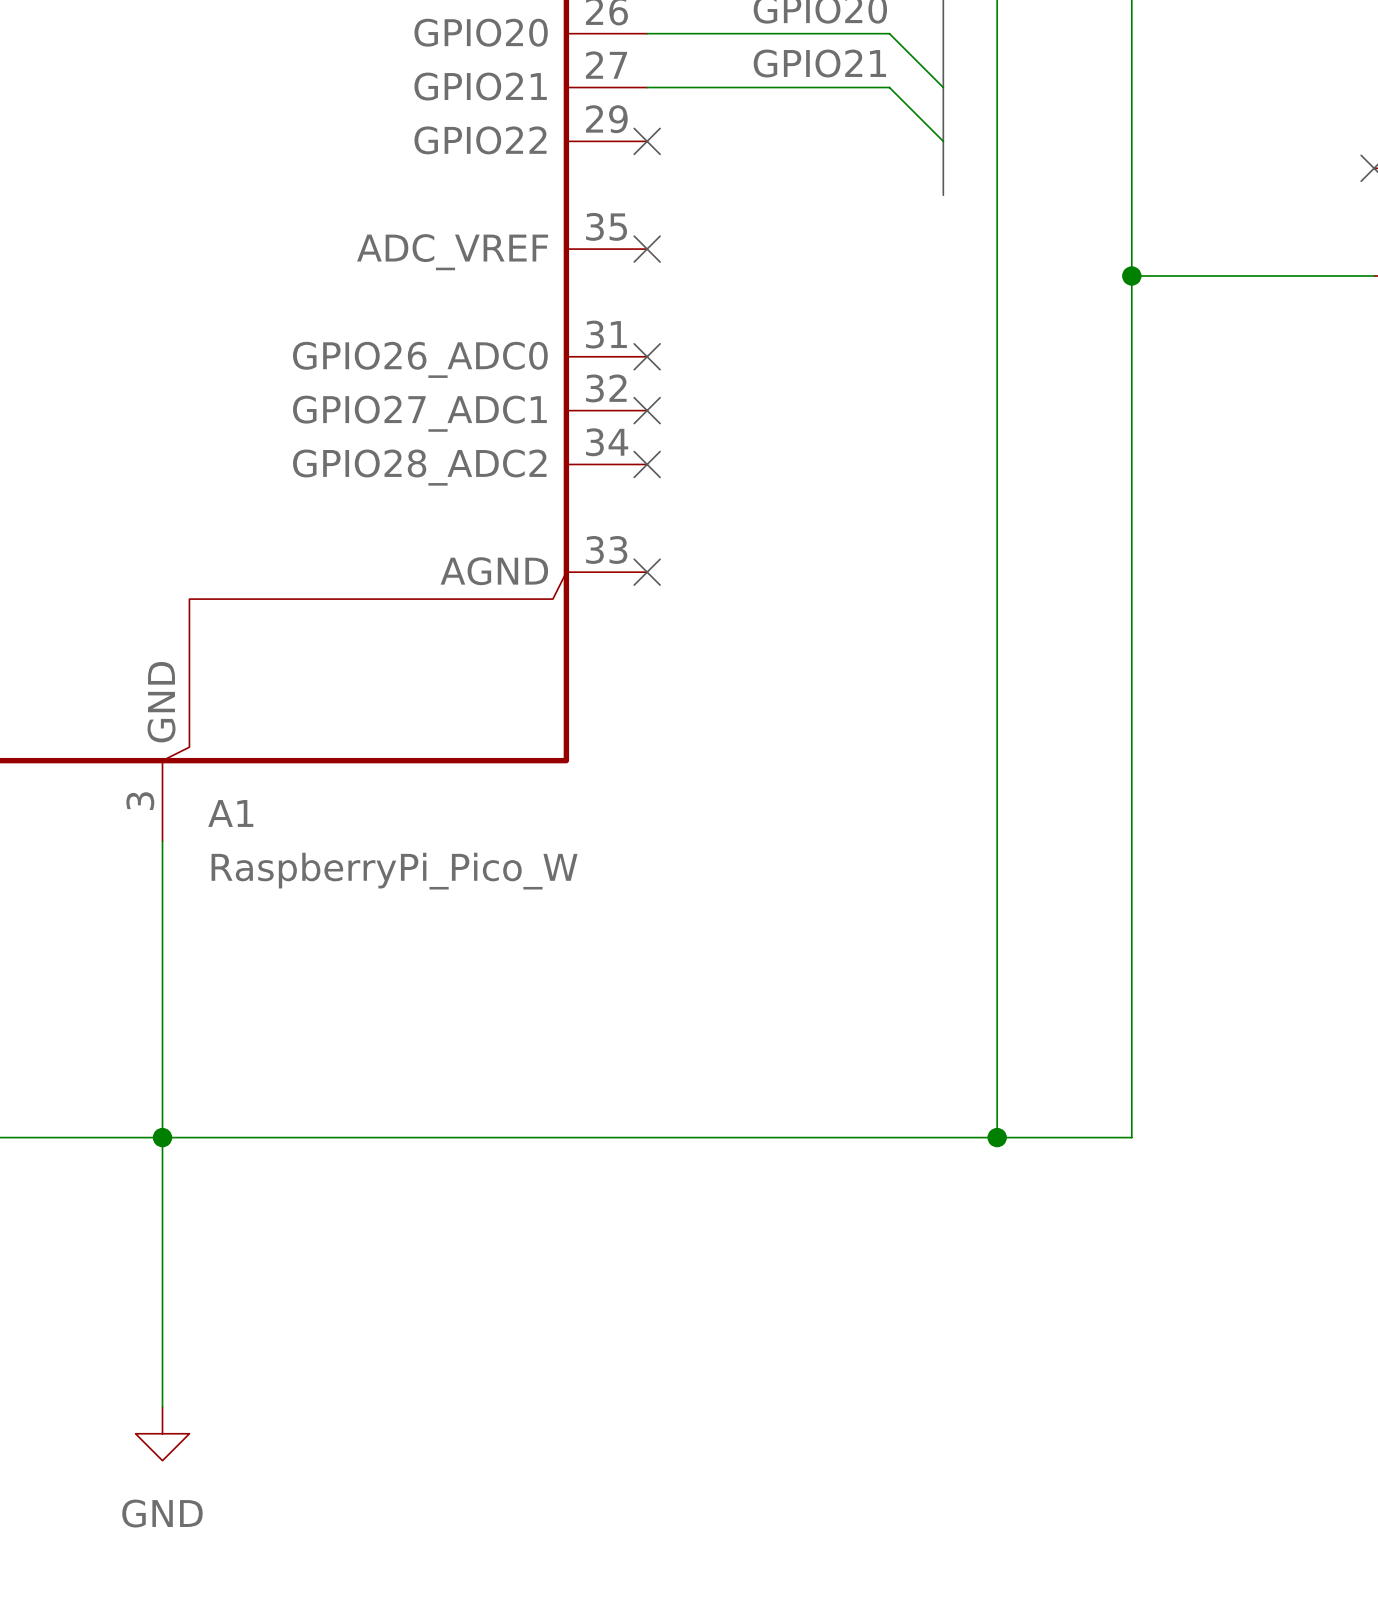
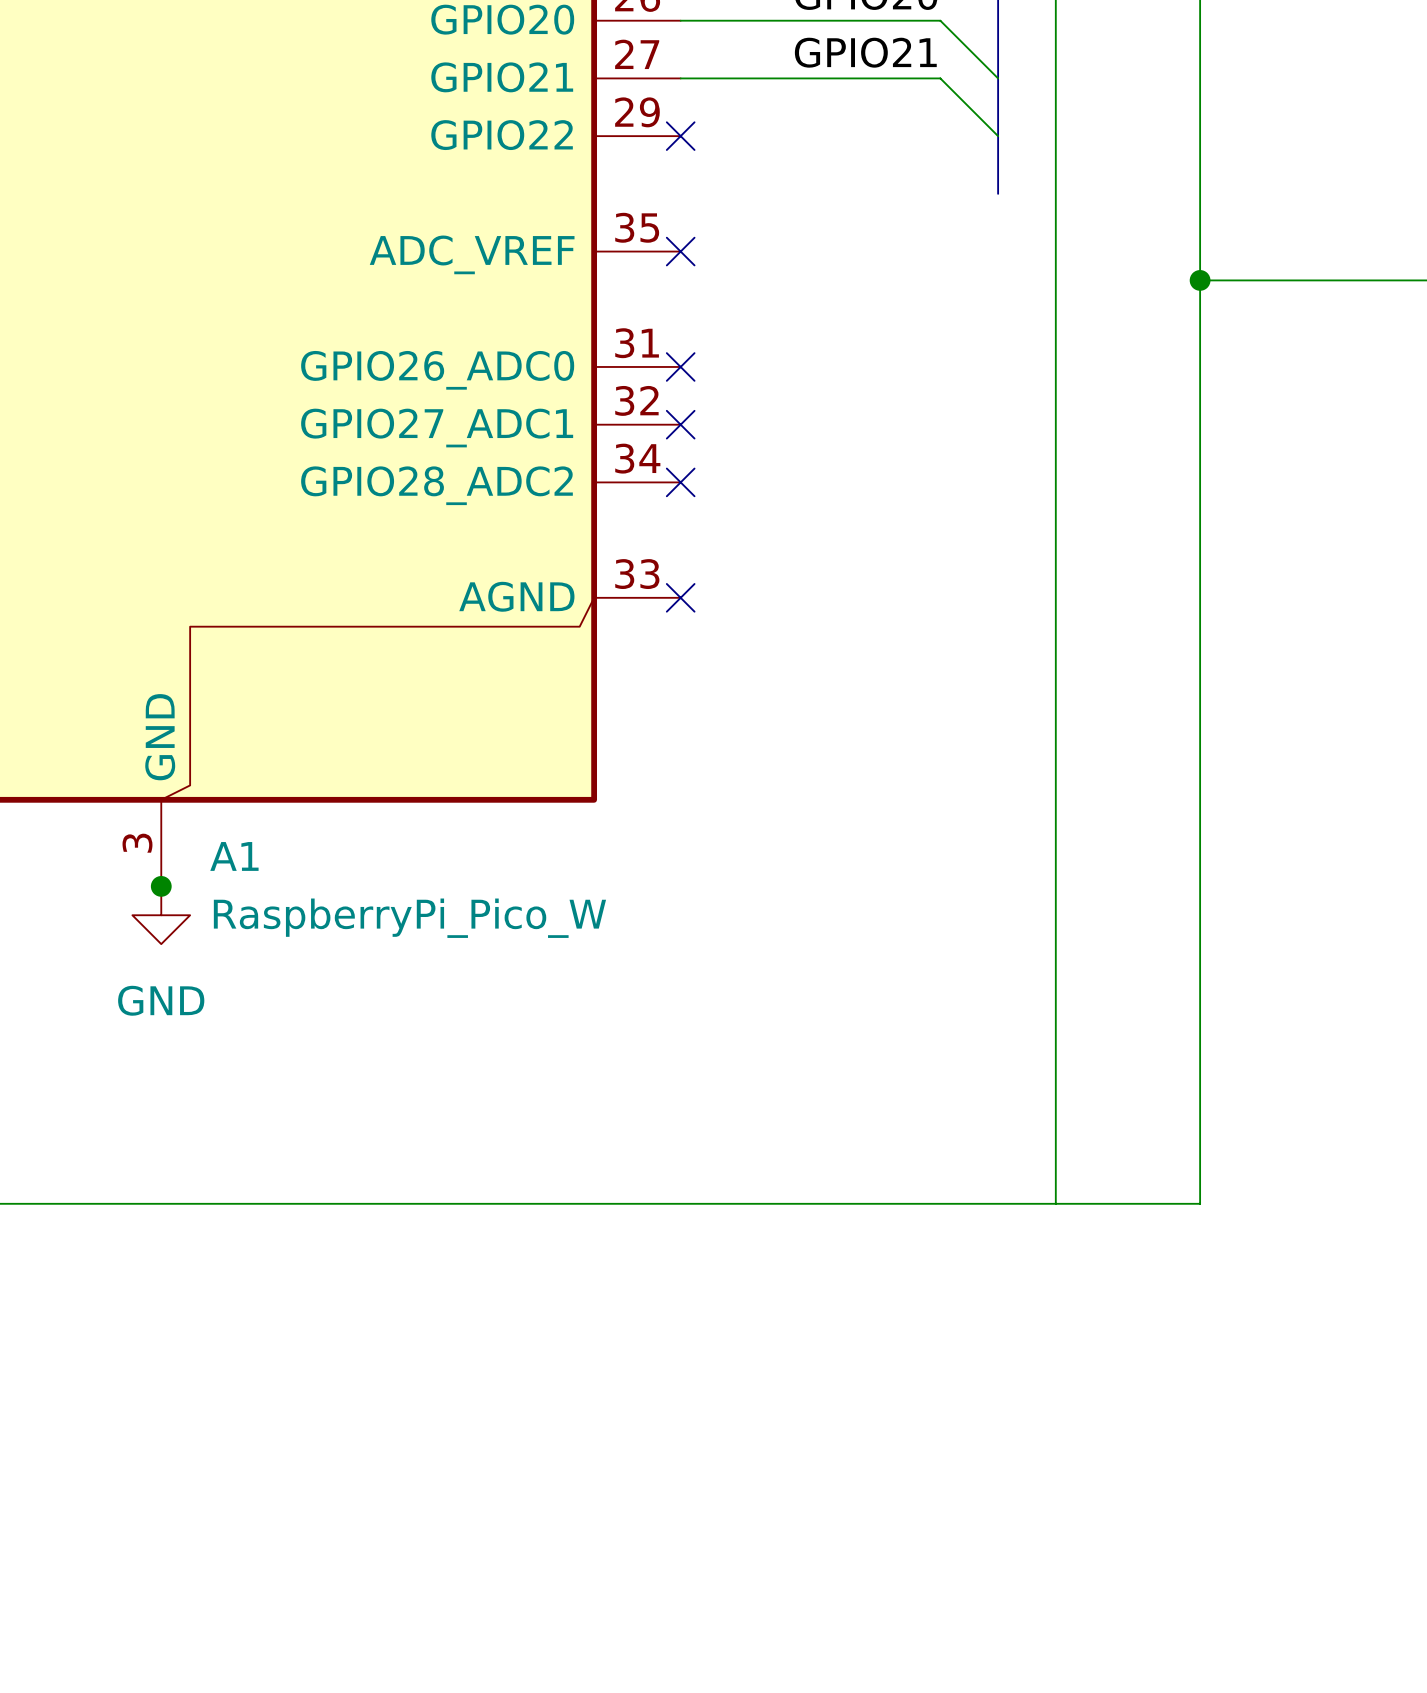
wire: (162, 841) (162, 1406) -> none
junction: none -> (161, 886)
power symbol: none -> GND (161, 915)
junction: (162, 1137) -> none
junction: (997, 1137) -> none
power symbol: GND (162, 1433) -> none

